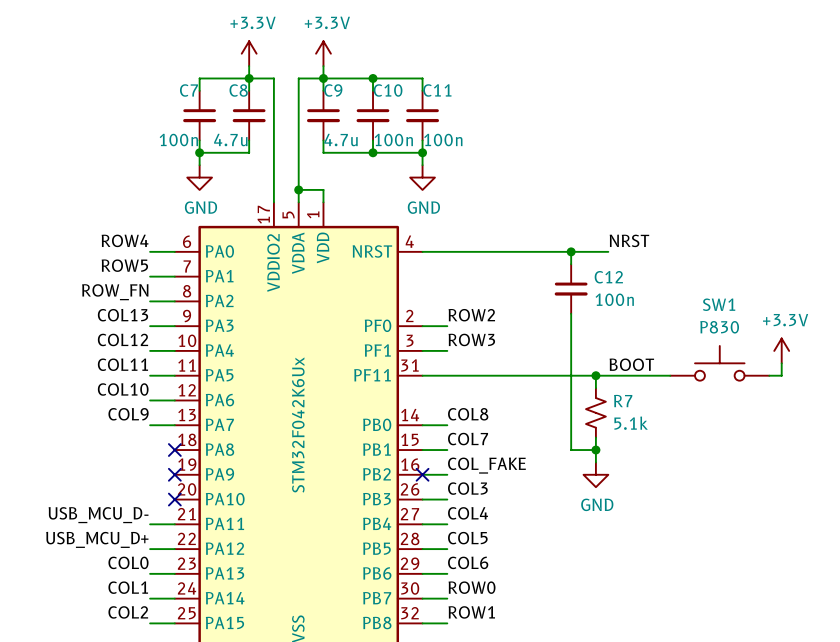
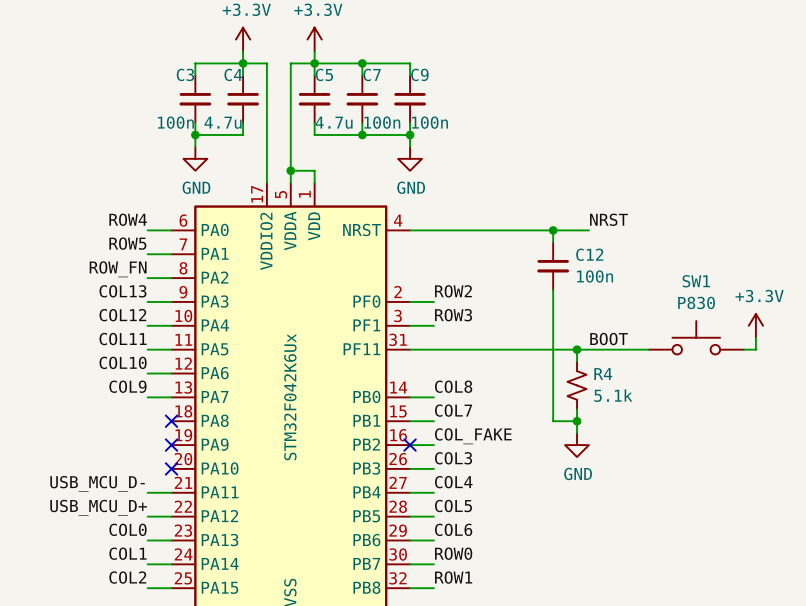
C7 name: C7 (188, 90) -> C3 (185, 74)
C8 name: C8 (238, 90) -> C4 (233, 74)
C9 name: C9 (333, 90) -> C5 (324, 74)
C10 name: C10 (388, 90) -> C7 (372, 74)
C11 name: C11 (437, 90) -> C9 (419, 74)
R7 name: R7 (623, 401) -> R4 (603, 374)

